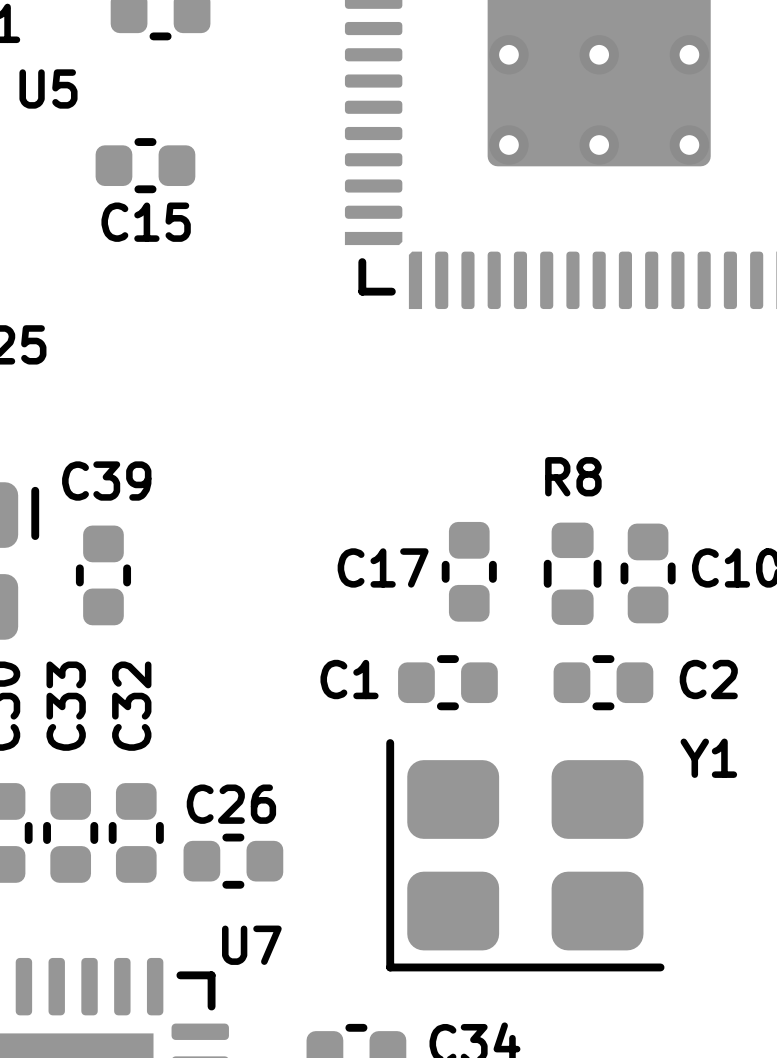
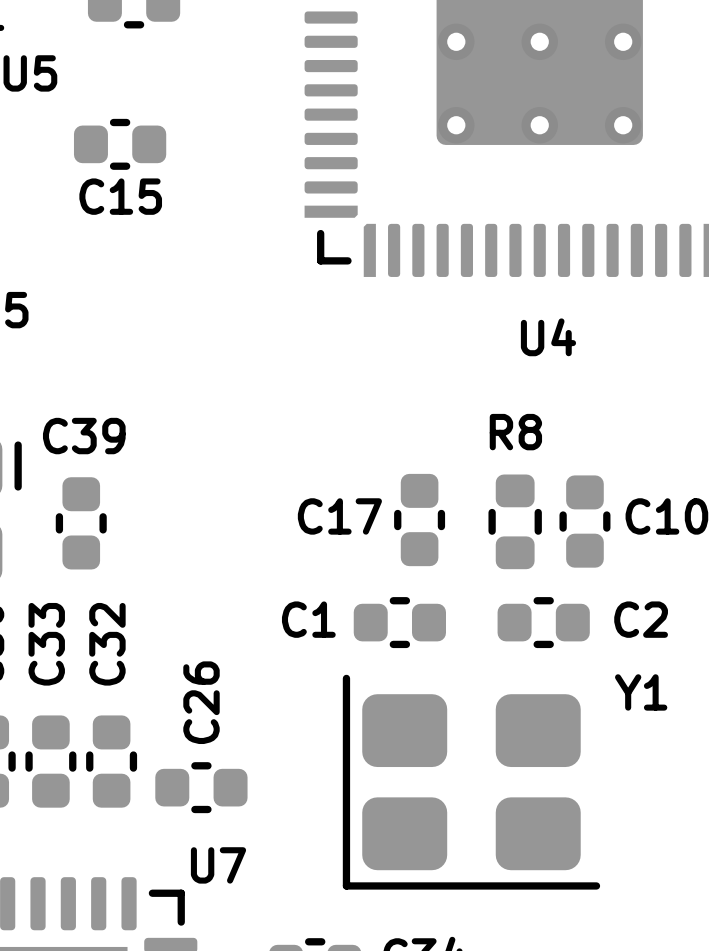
U4 name: none -> U4 (548, 337)
C26 name rotation: 0° (231, 804) -> 90° counterclockwise (201, 702)

